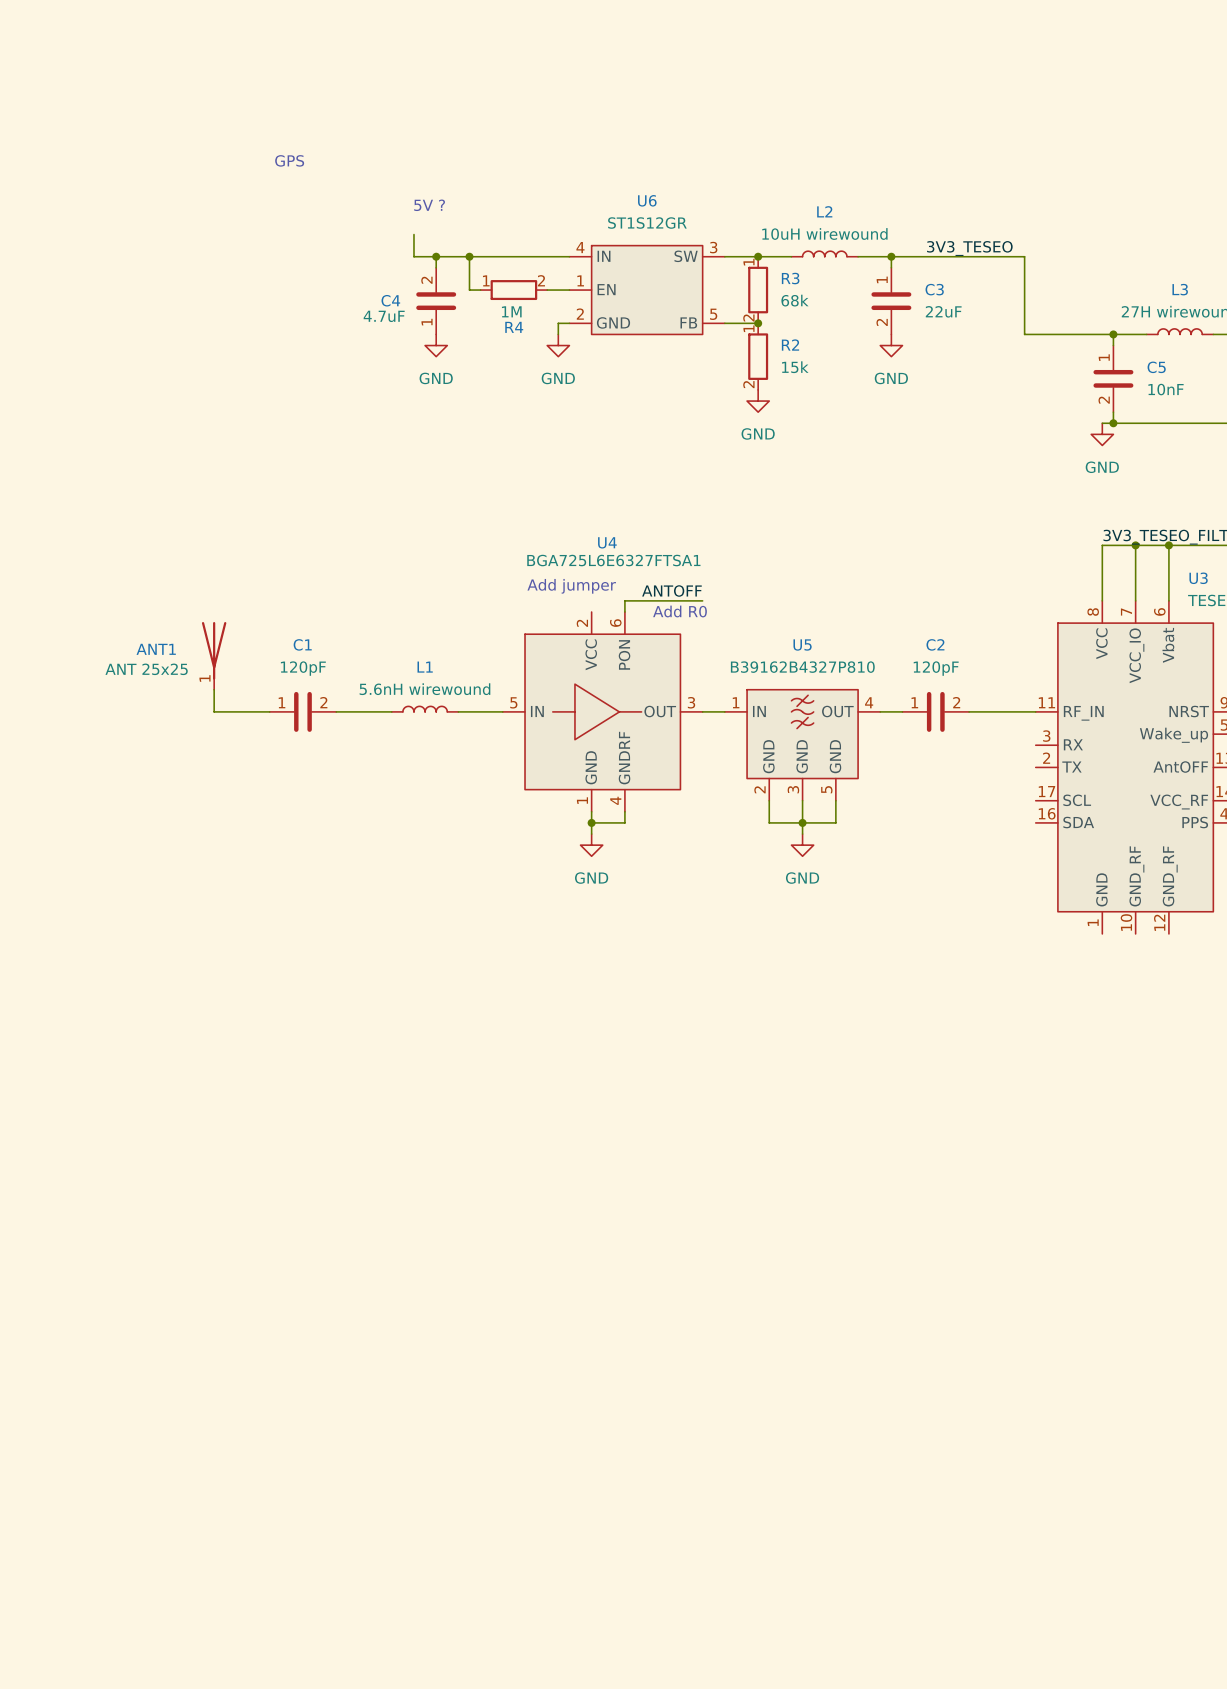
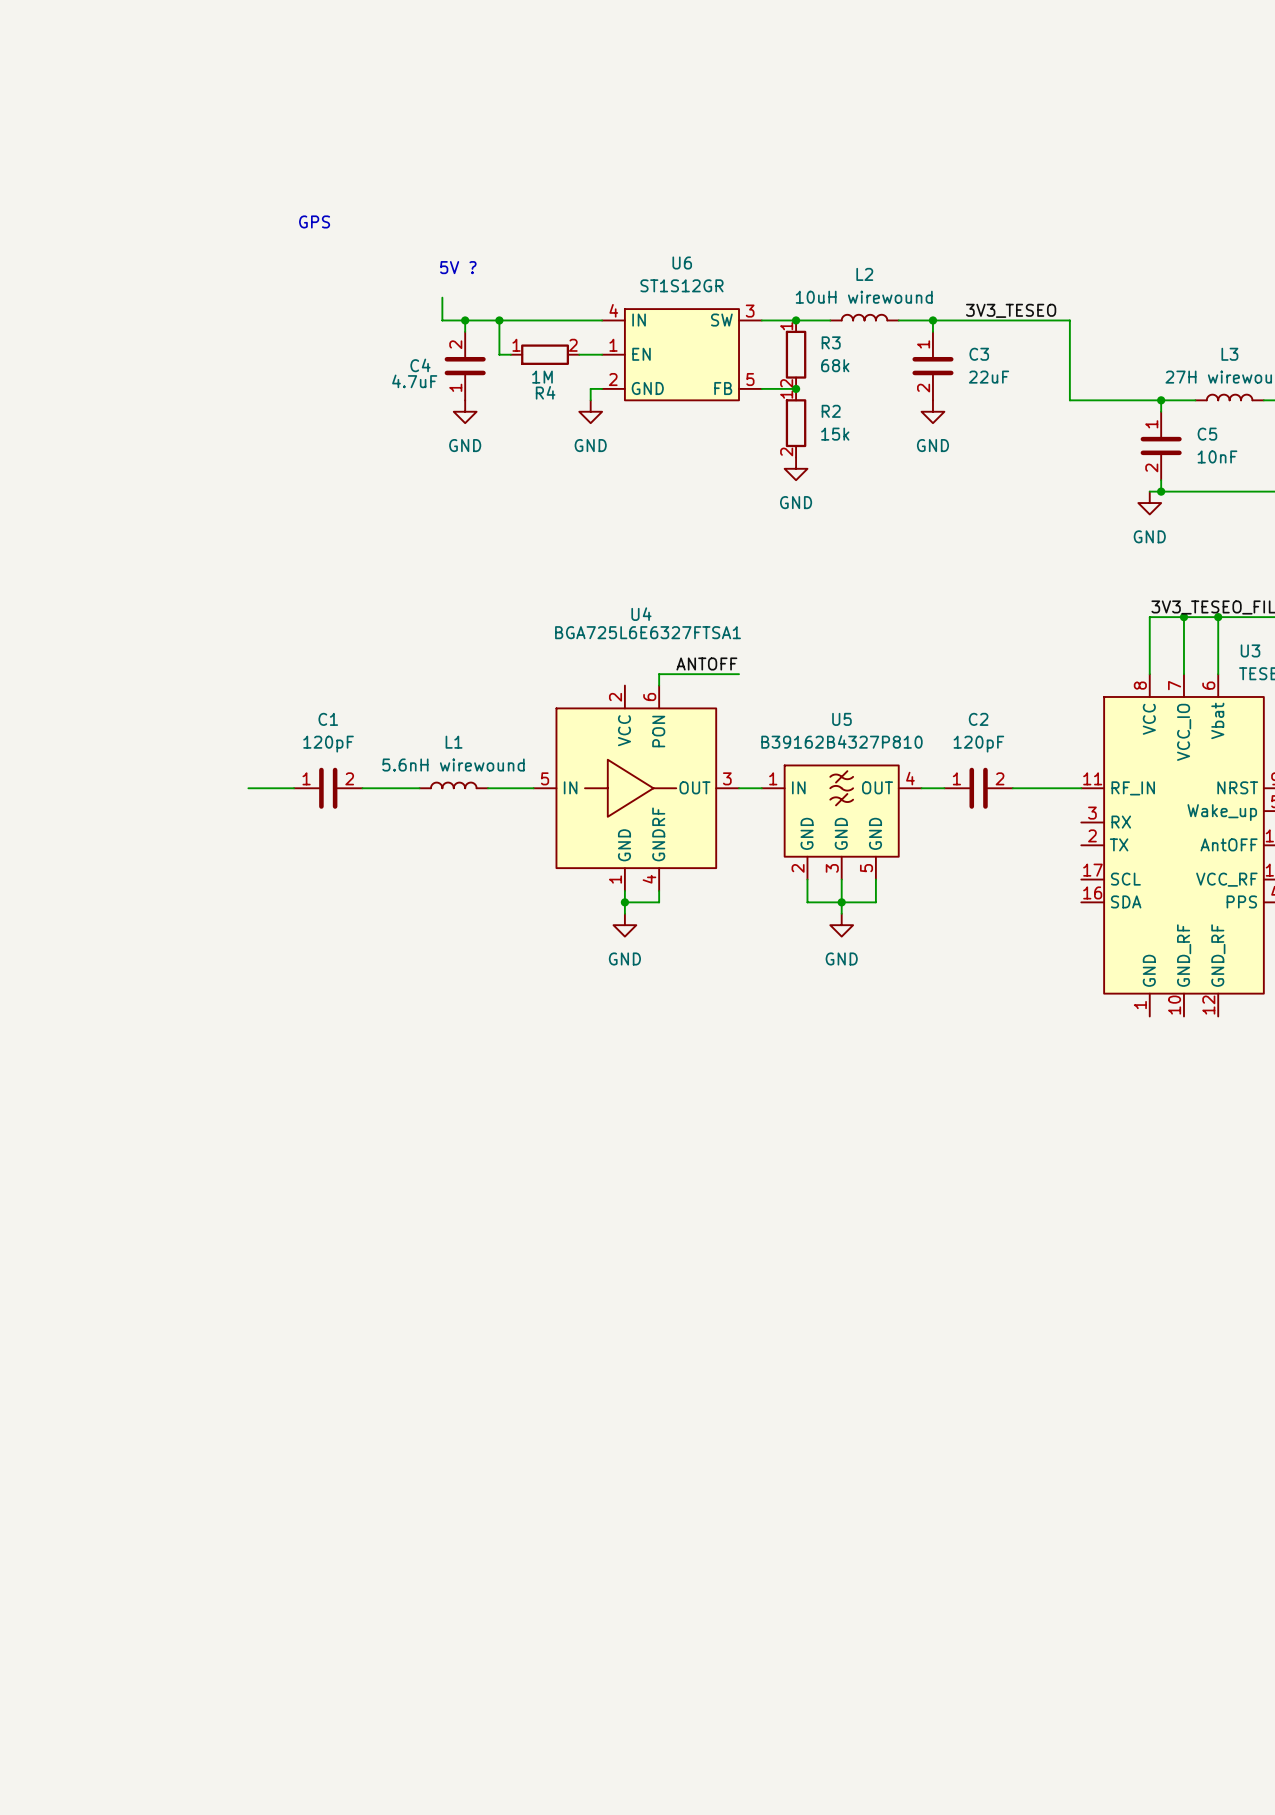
text: Add jumper (571, 586) -> none
text: Add R0 (679, 611) -> none
ANT1: (214, 655) -> none
wire: (214, 689) (214, 711) (225, 711) -> none

